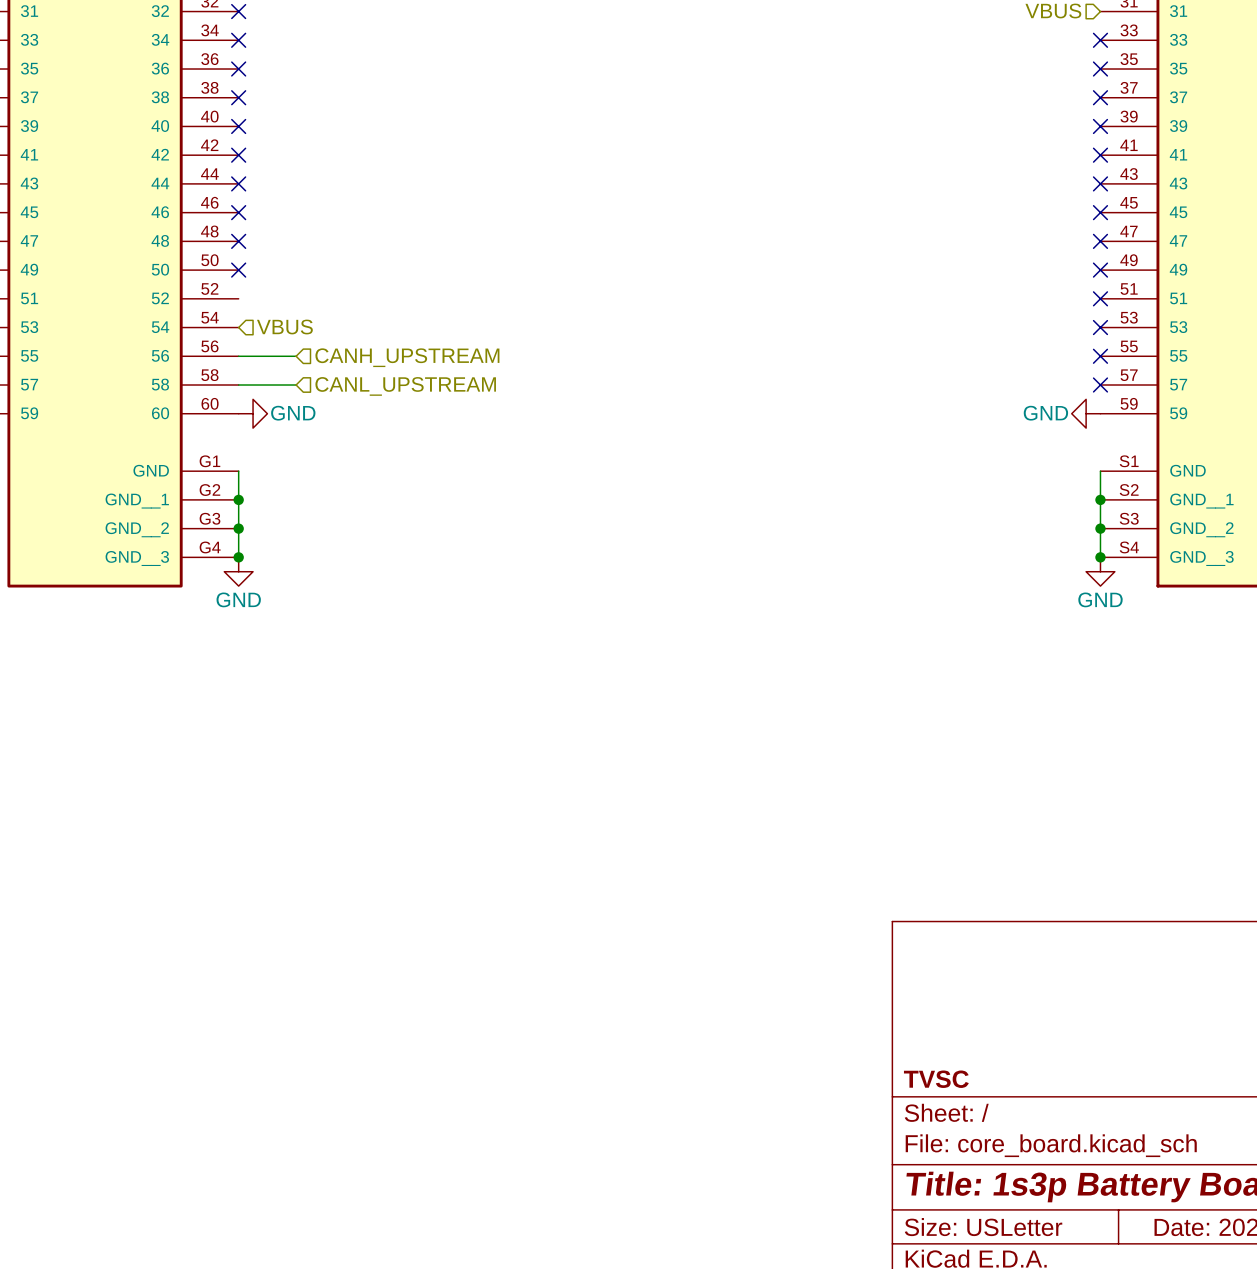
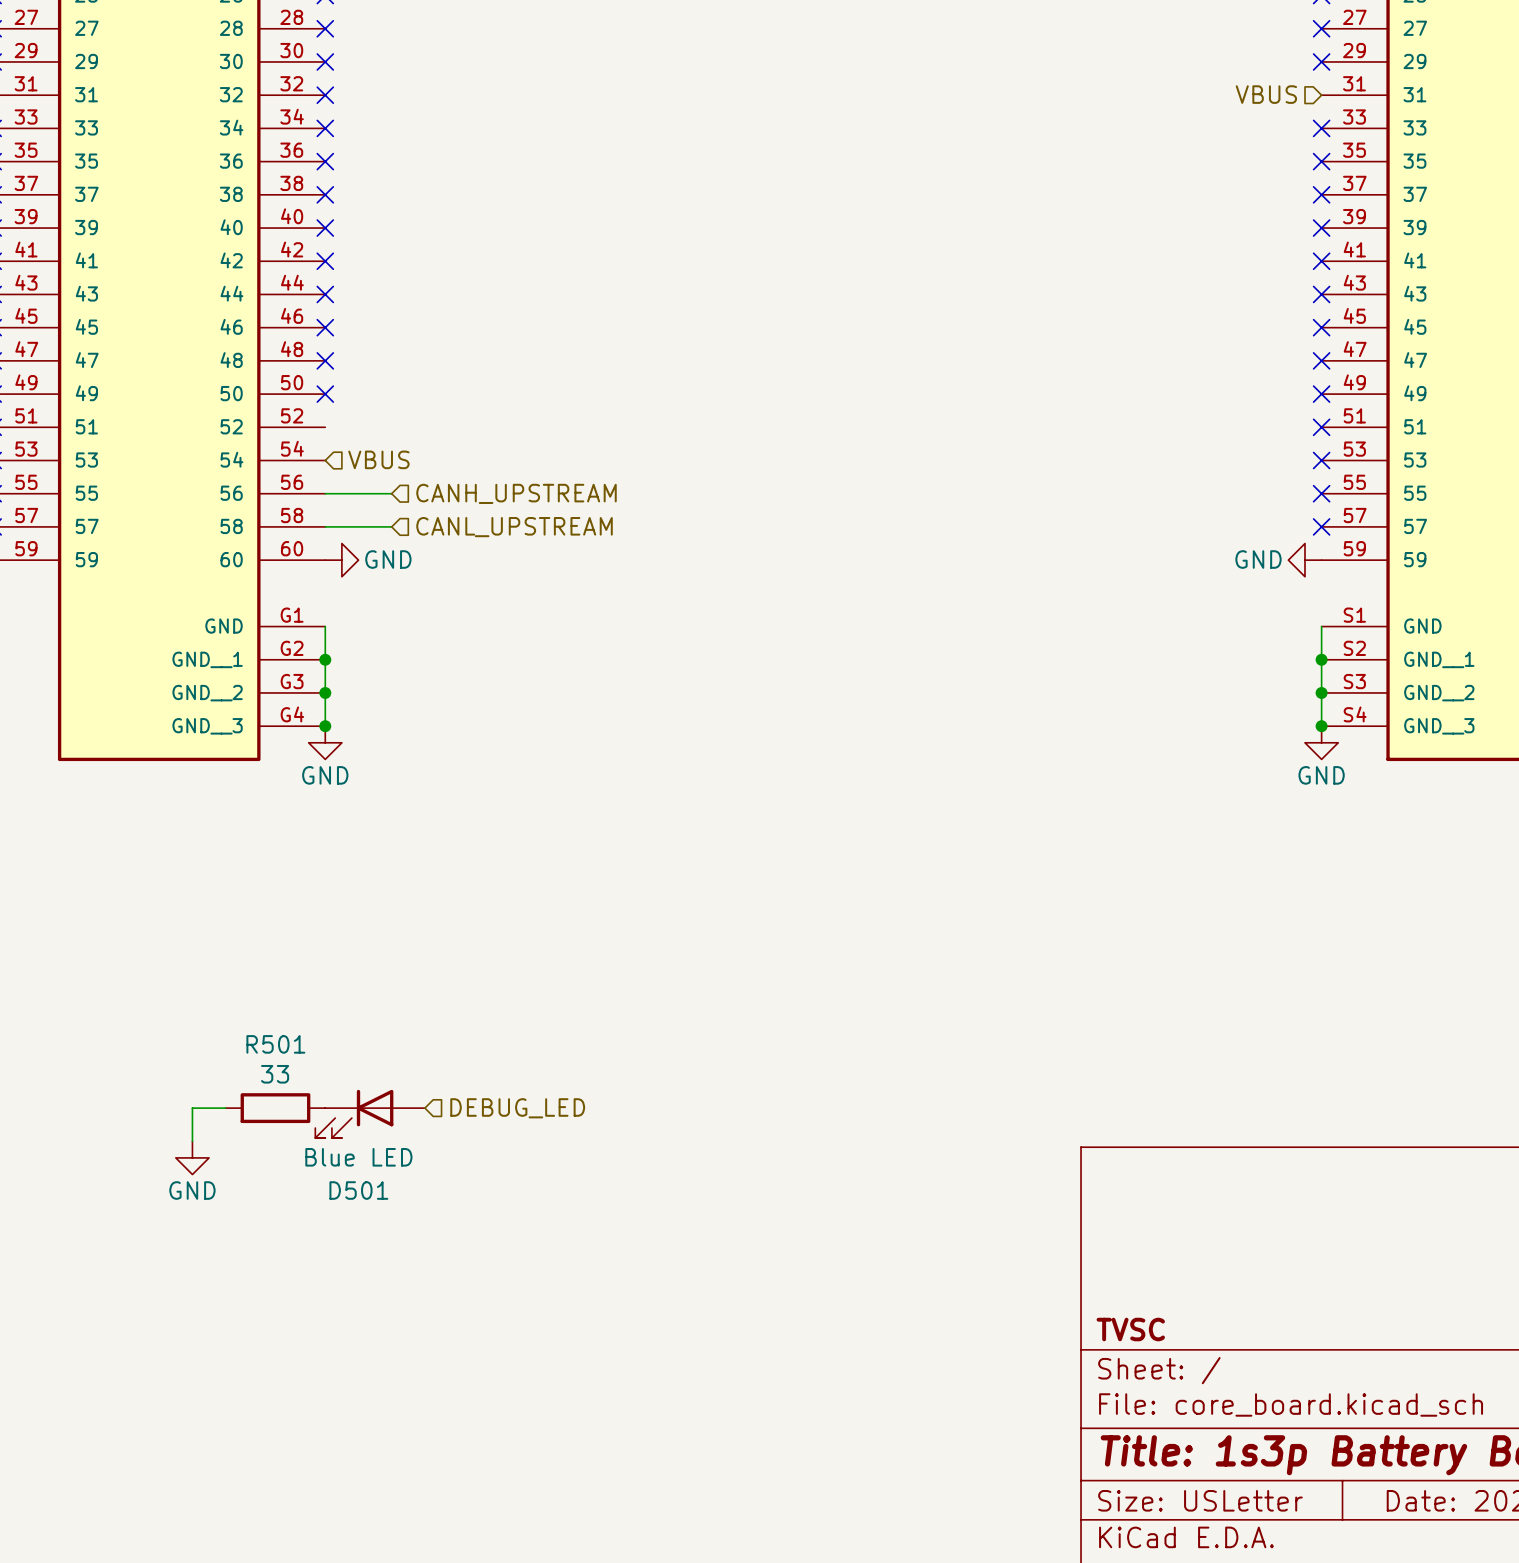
wire: none -> (225, 1108) (192, 1108) (192, 1141)
R501: none -> 33 (275, 1108)
hierarchical label: none -> DEBUG_LED (517, 1108)
D501: none -> Blue LED (370, 1113)
power symbol: none -> GND (192, 1157)

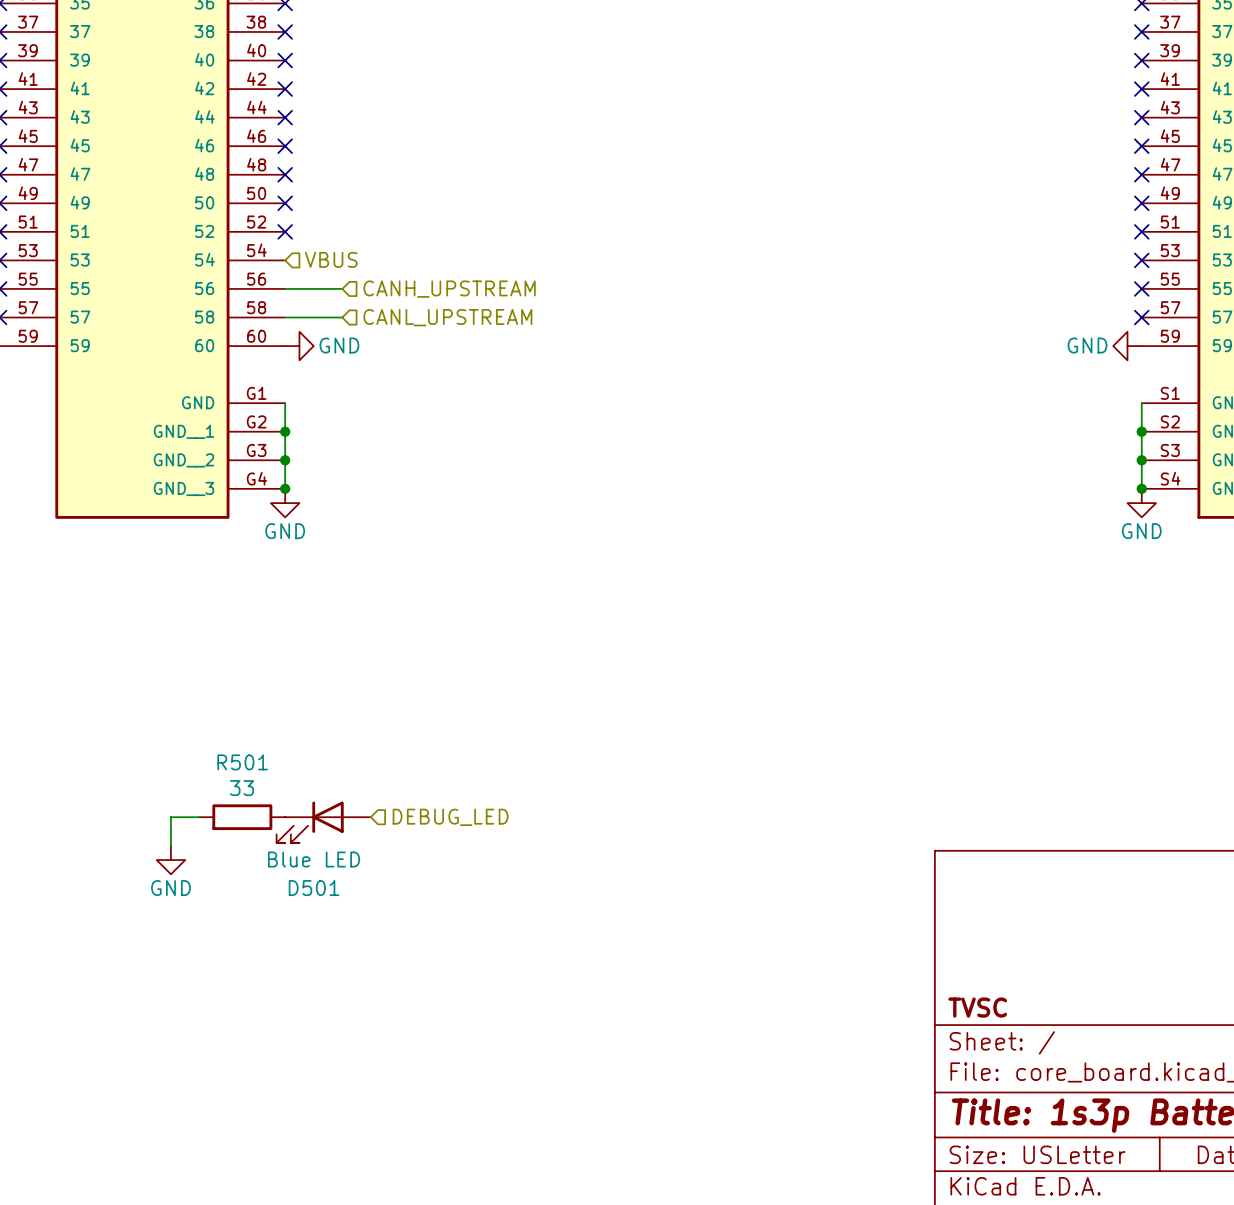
no-connect mark: none -> (285, 231)

